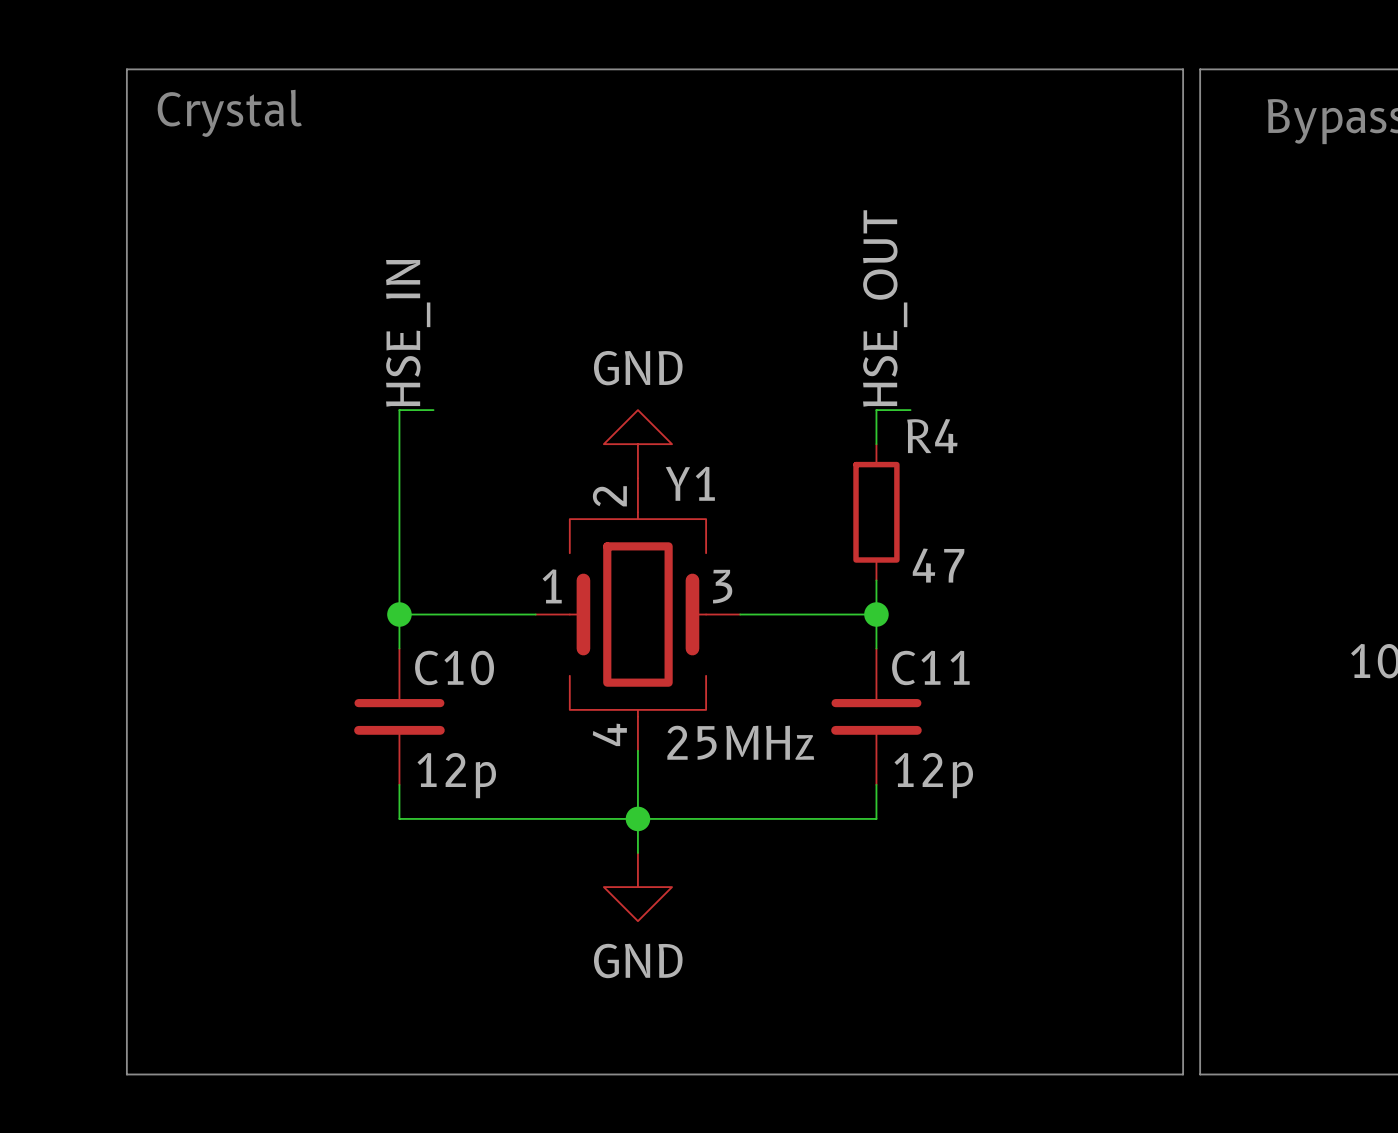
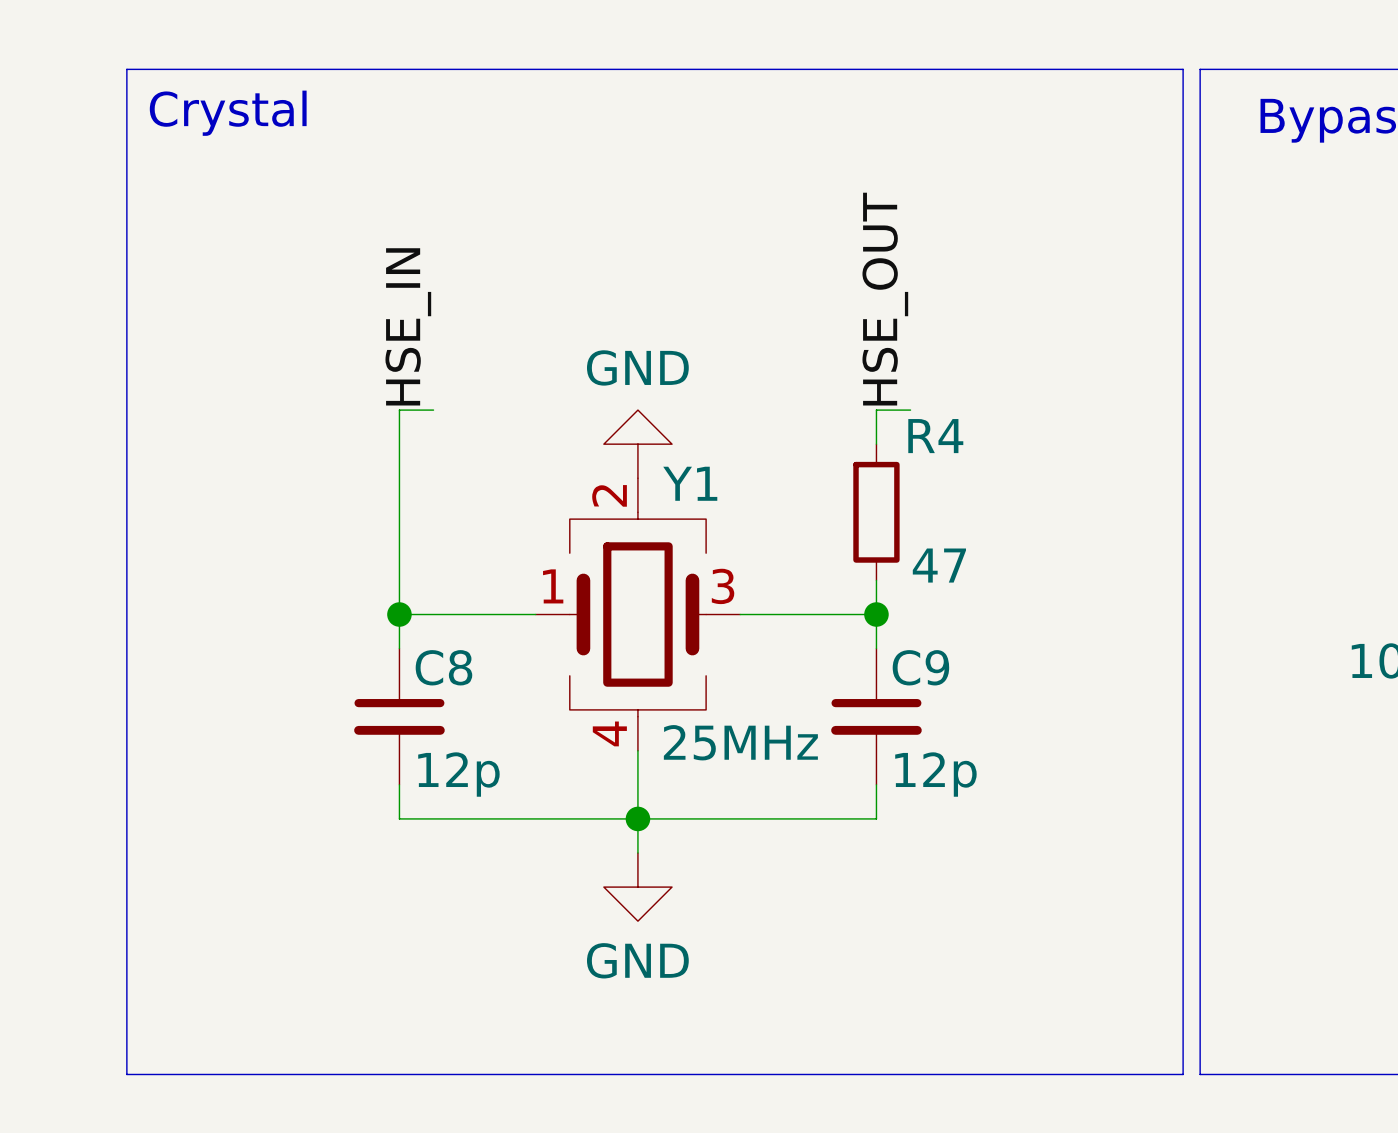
C10 name: C10 (454, 667) -> C8 (443, 667)
C11 name: C11 (930, 667) -> C9 (920, 667)

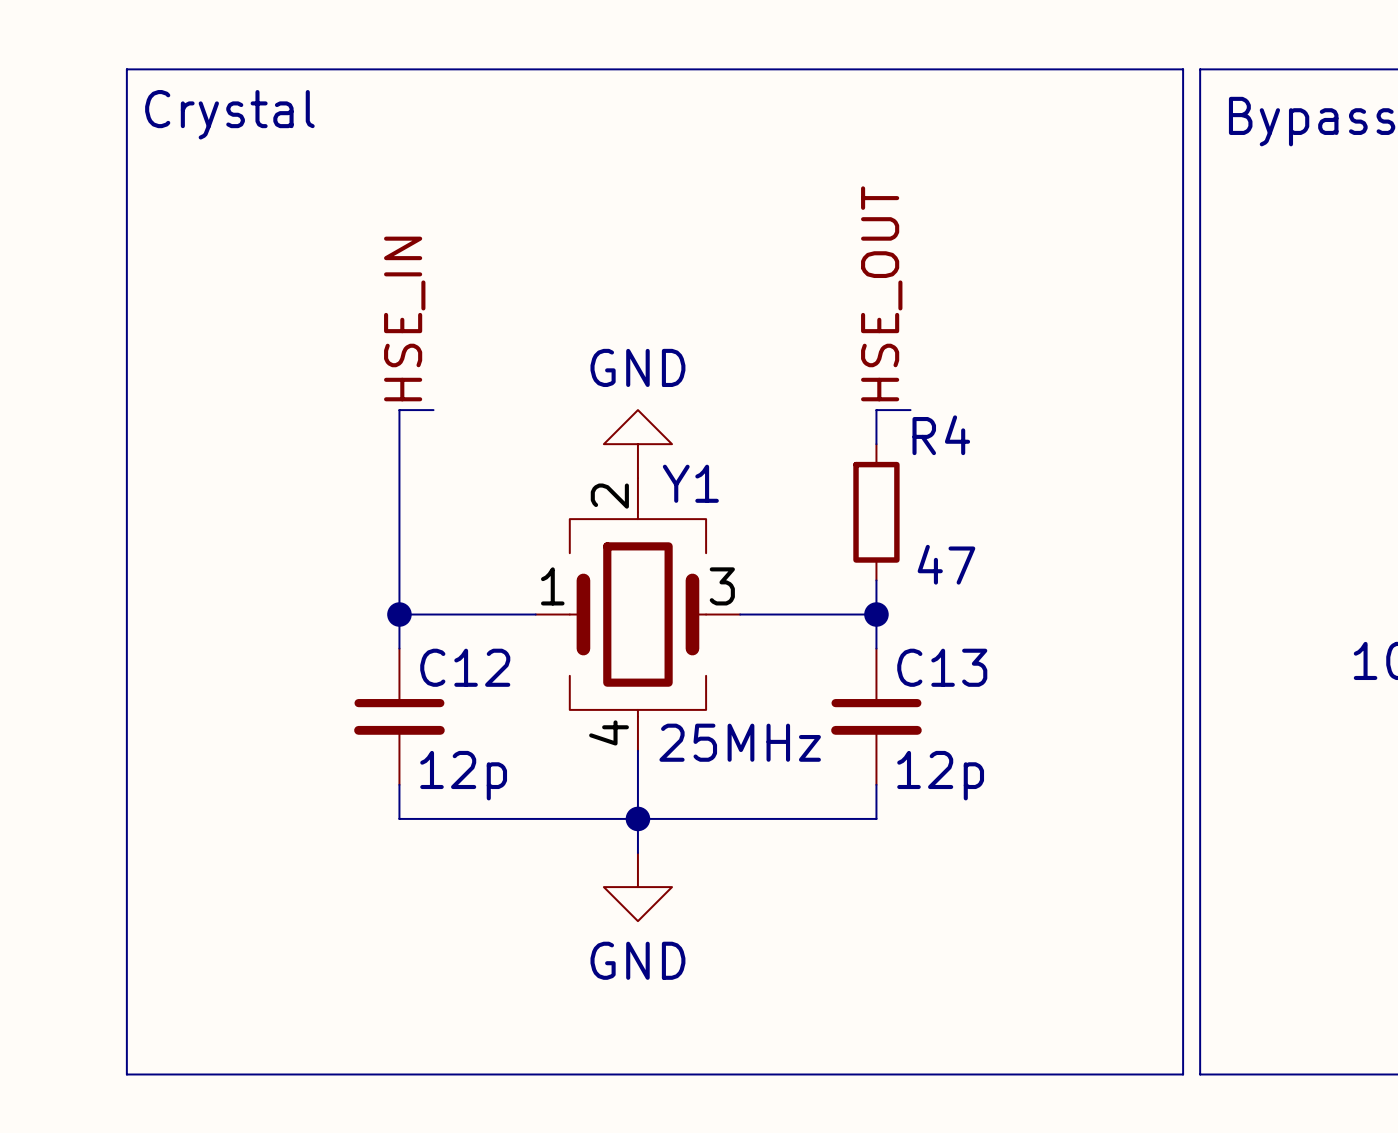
C8 name: C8 (443, 667) -> C12 (465, 667)
C9 name: C9 (920, 667) -> C13 (942, 667)

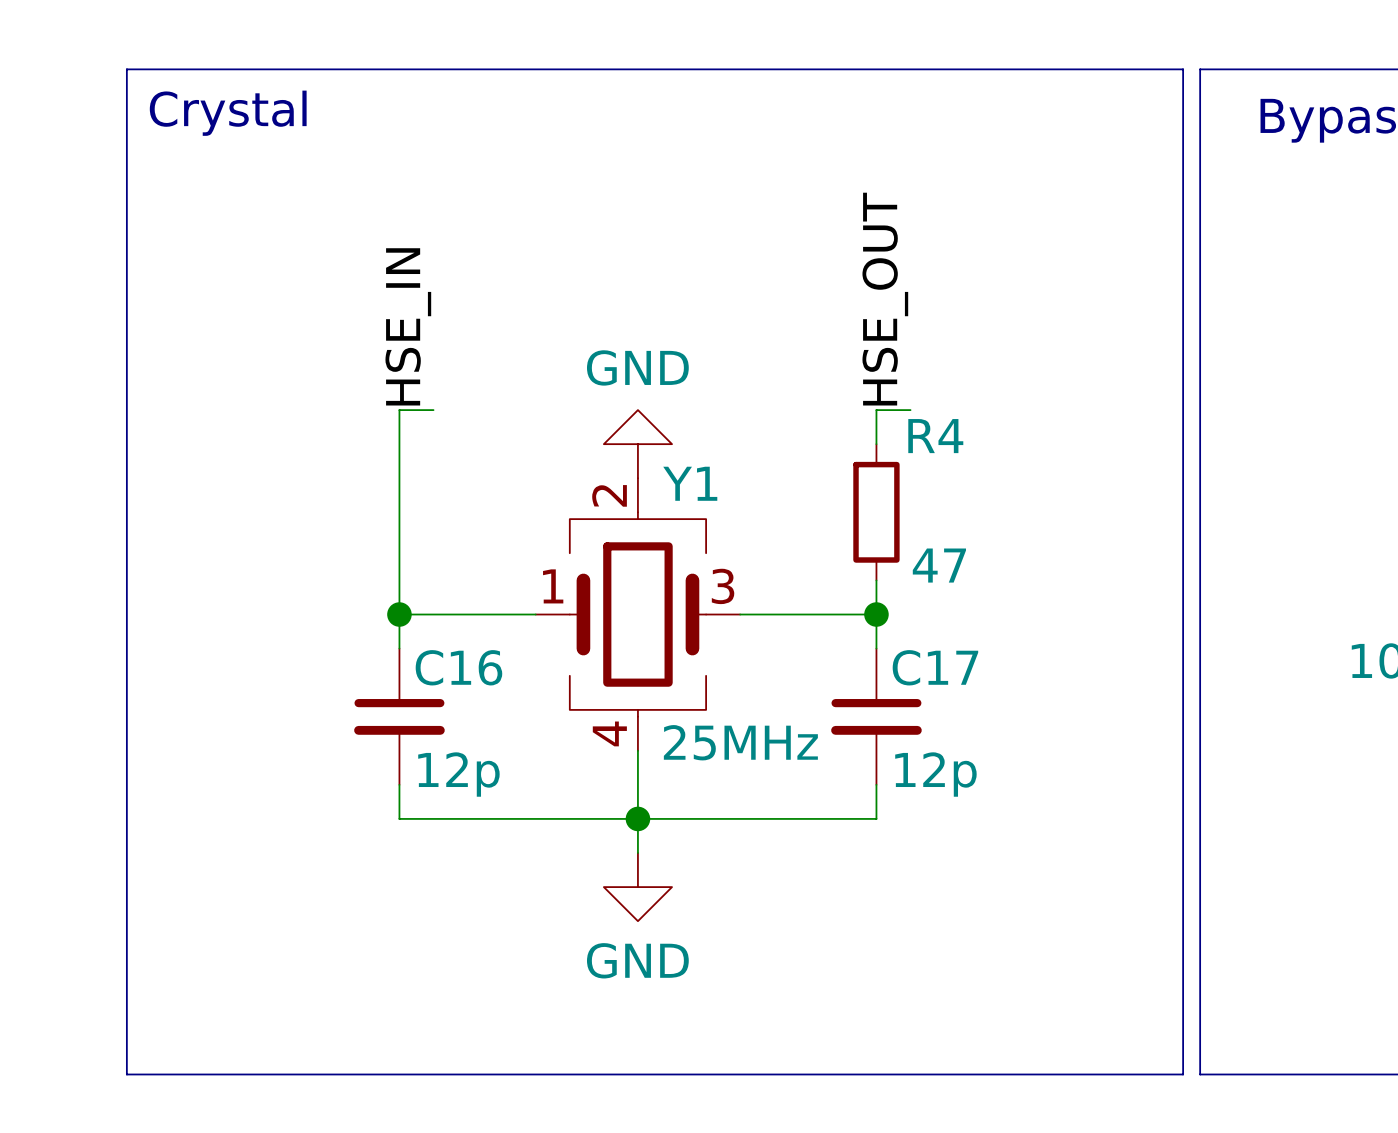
C12 name: C12 (465, 667) -> C16 (458, 667)
C13 name: C13 (942, 667) -> C17 (935, 667)

